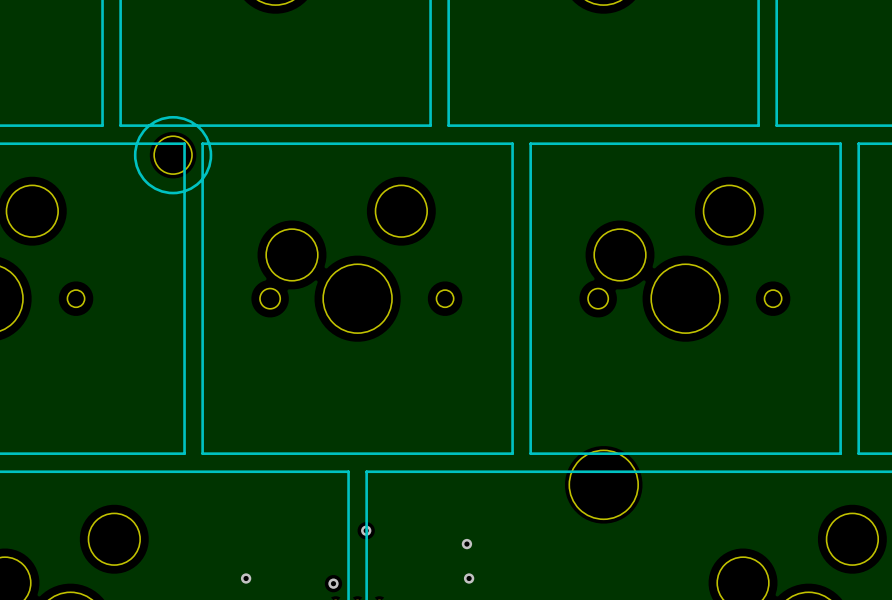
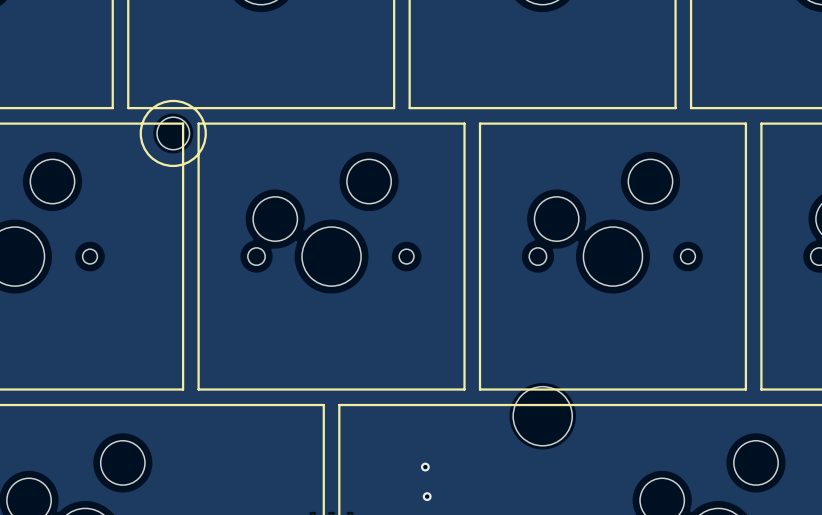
via: (366, 530) -> none
via: (246, 578) -> none
via: (333, 583) -> none

